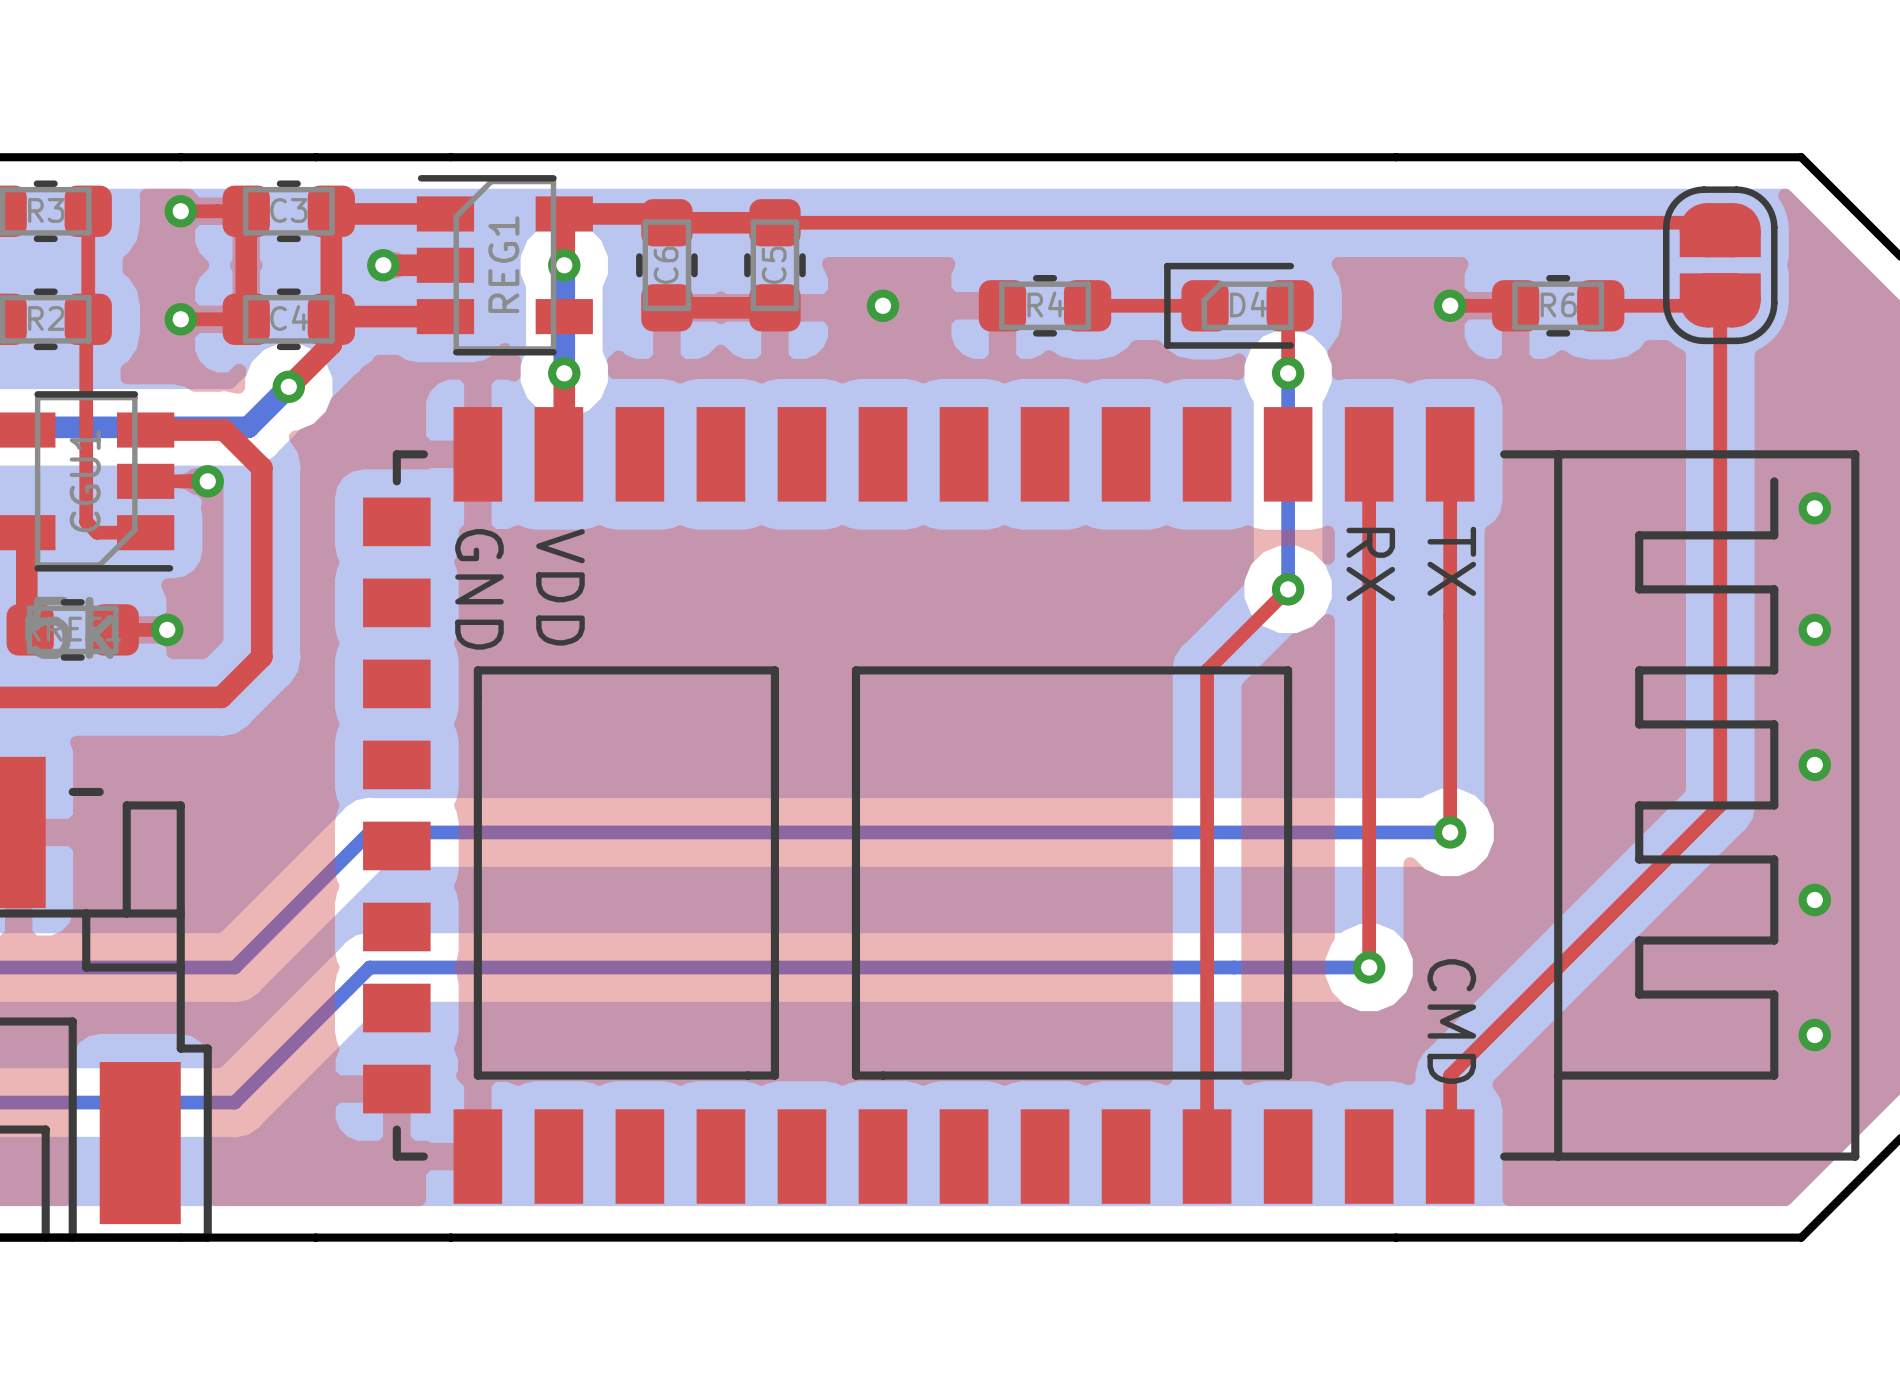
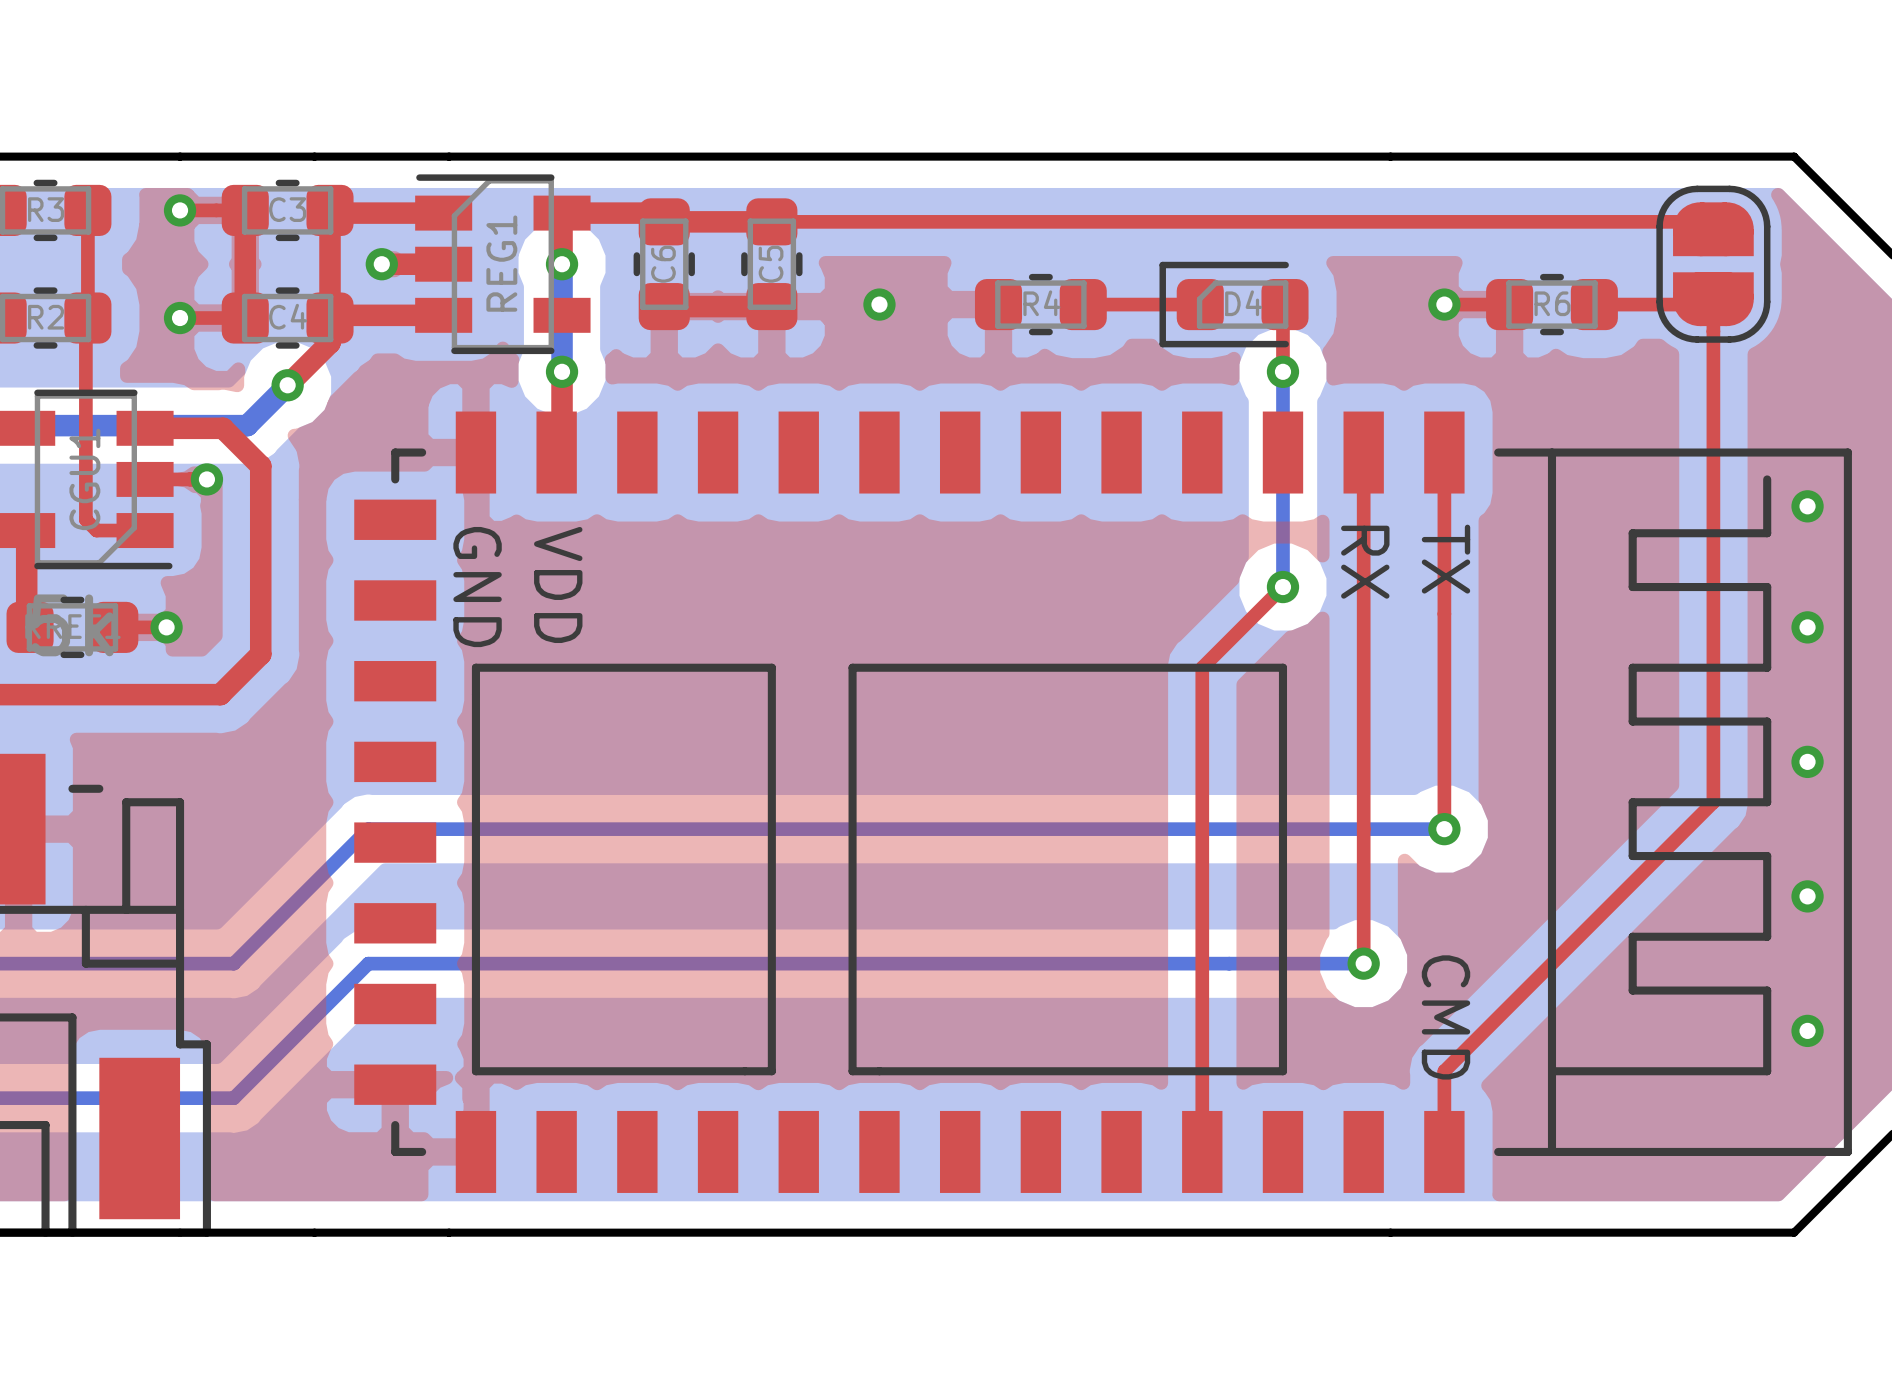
part footprint: [363, 407, 1860, 1204] -> [354, 411, 1852, 1193]

